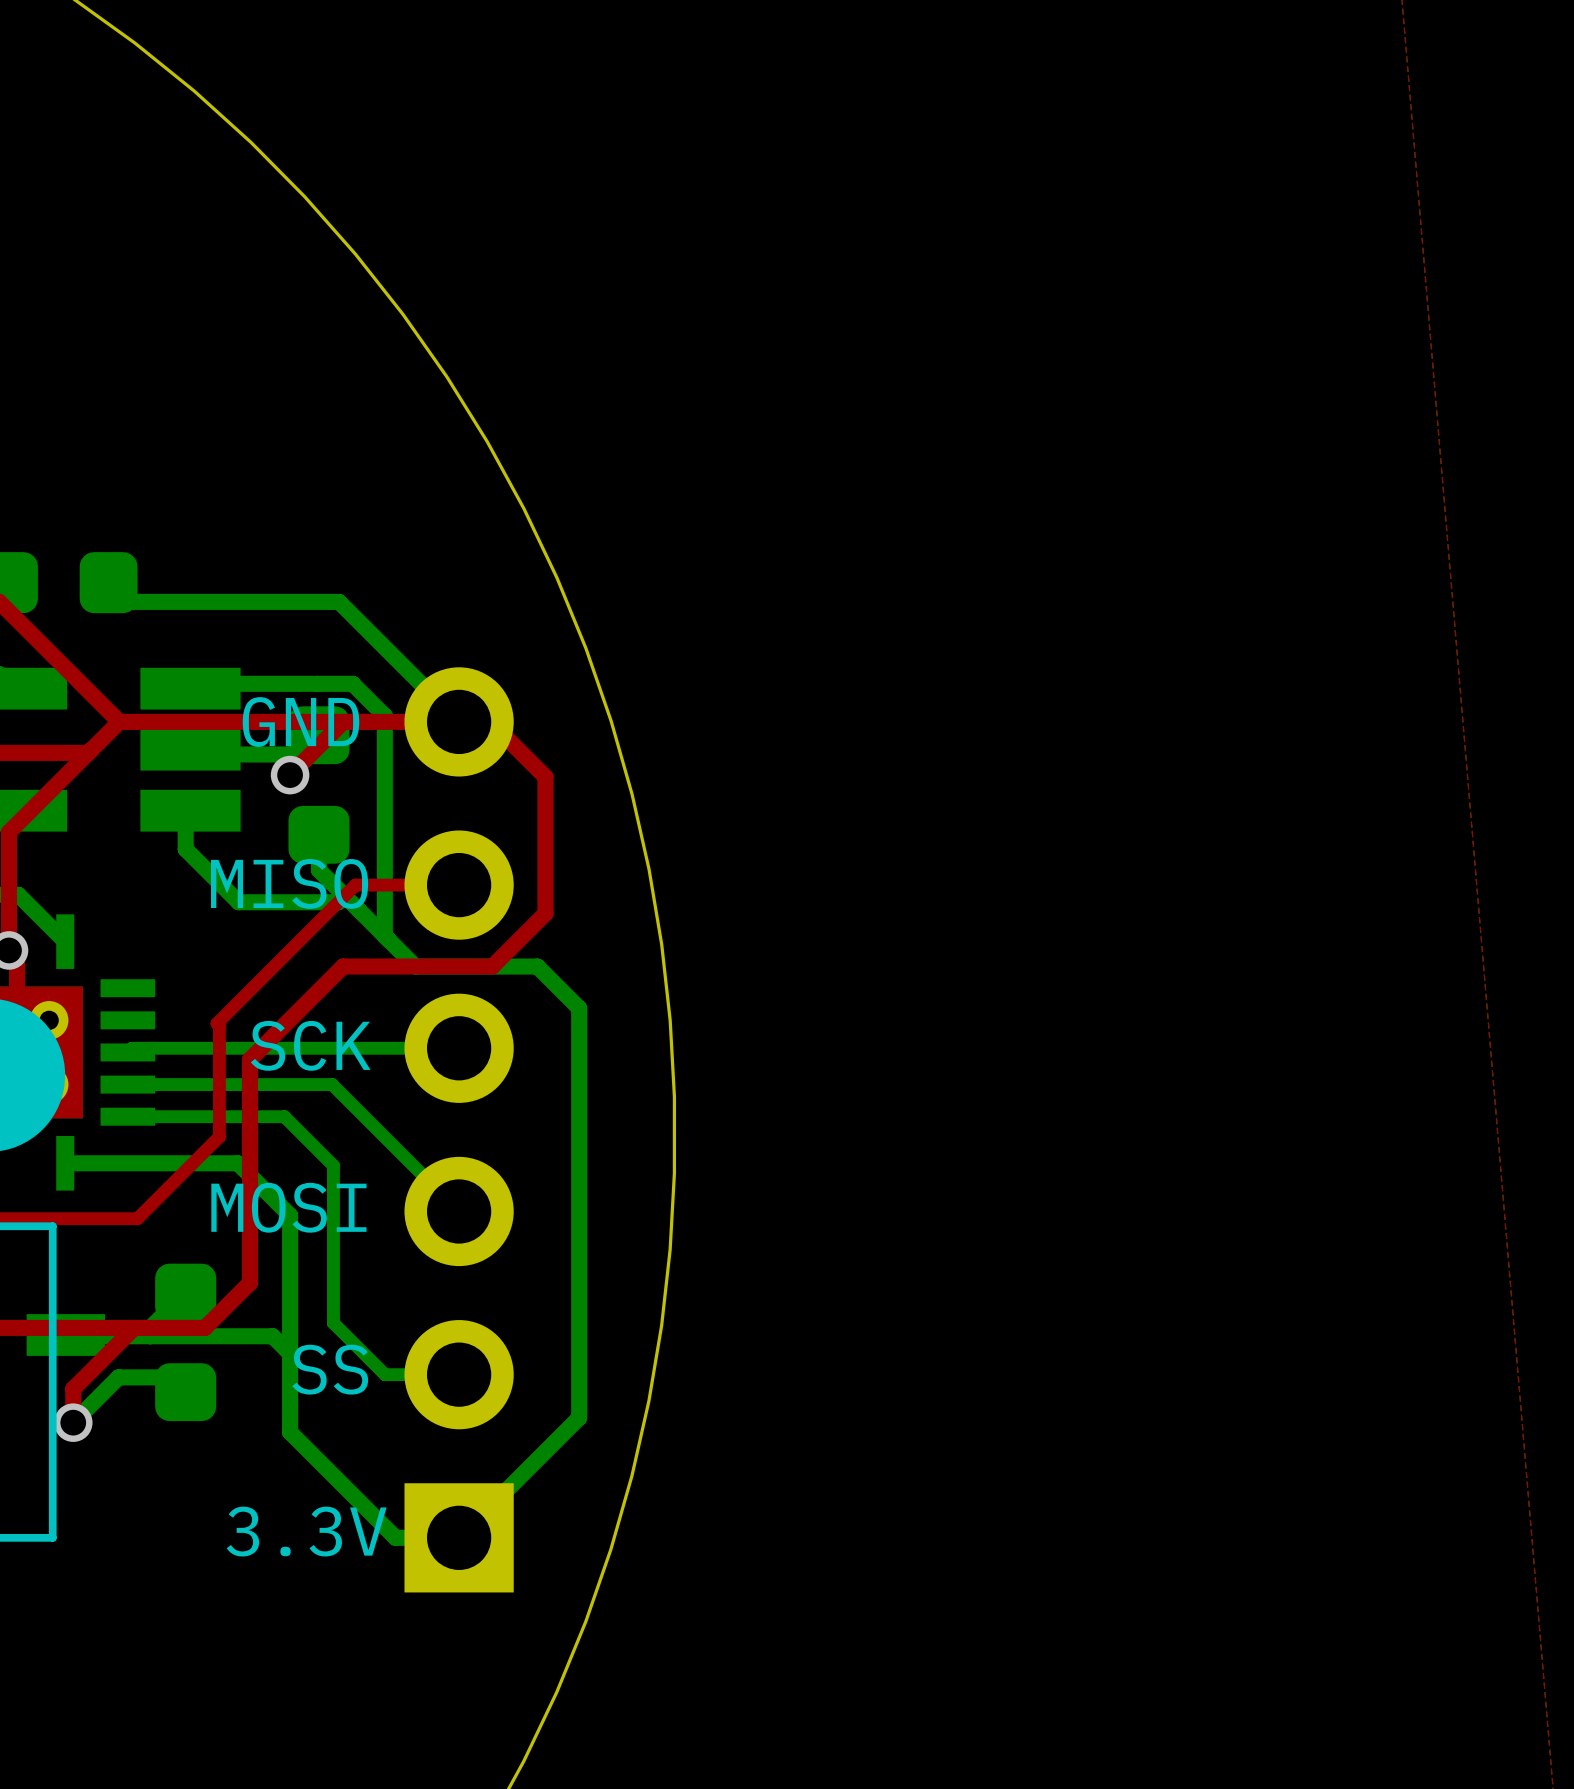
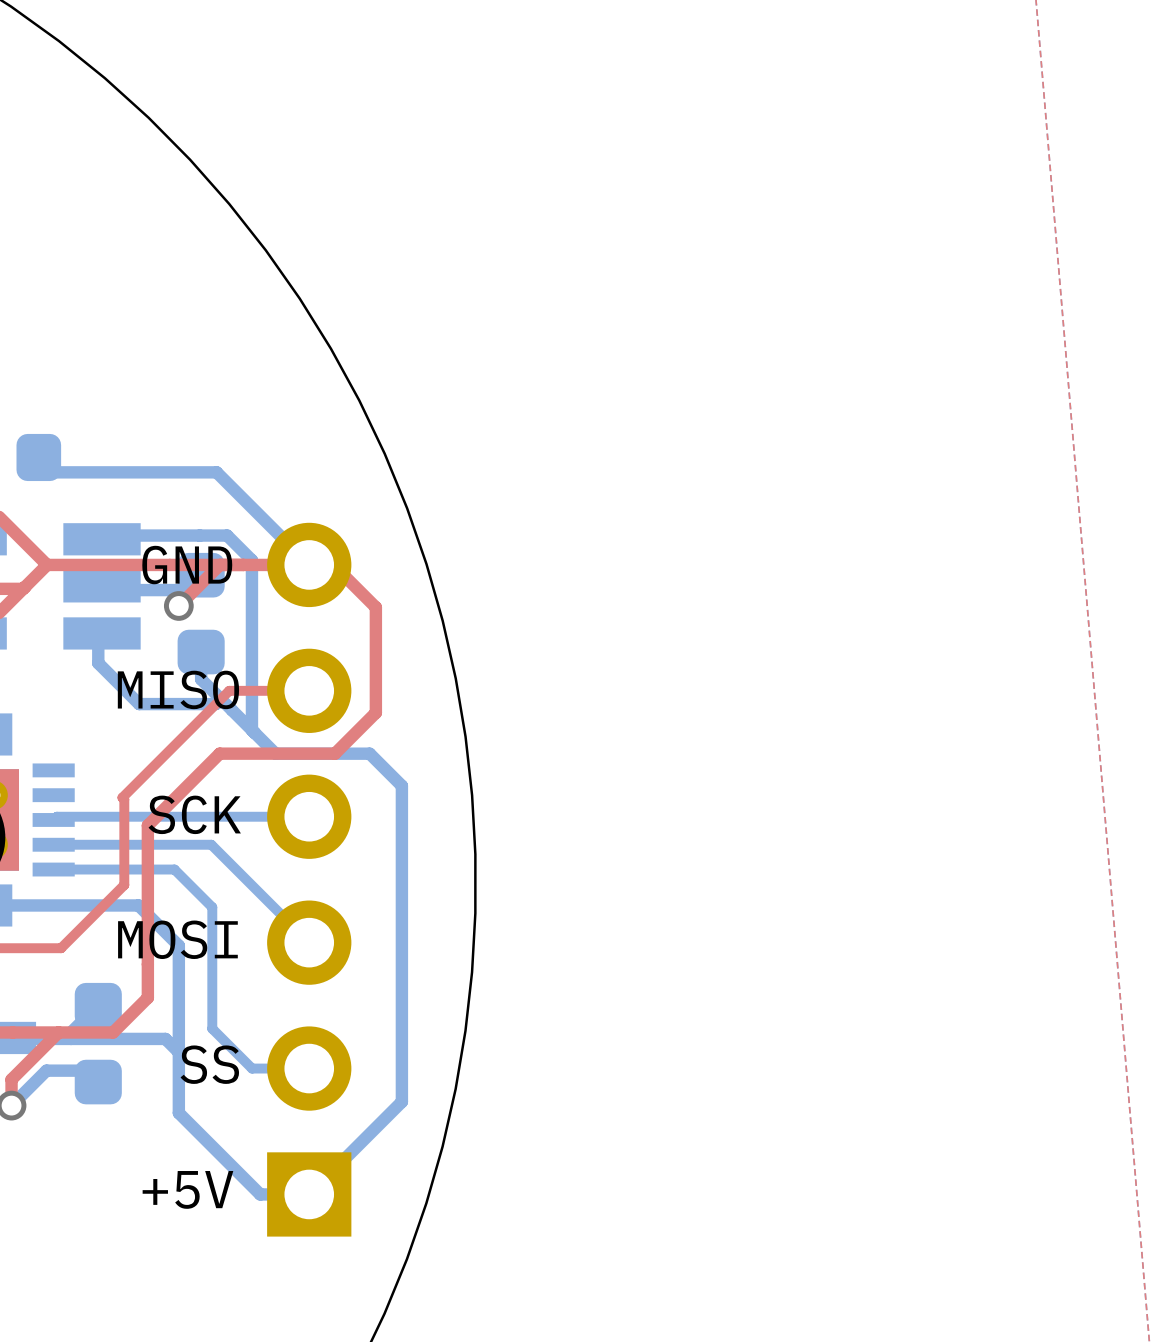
text: 3.3V (306, 1531) -> +5V (187, 1189)

